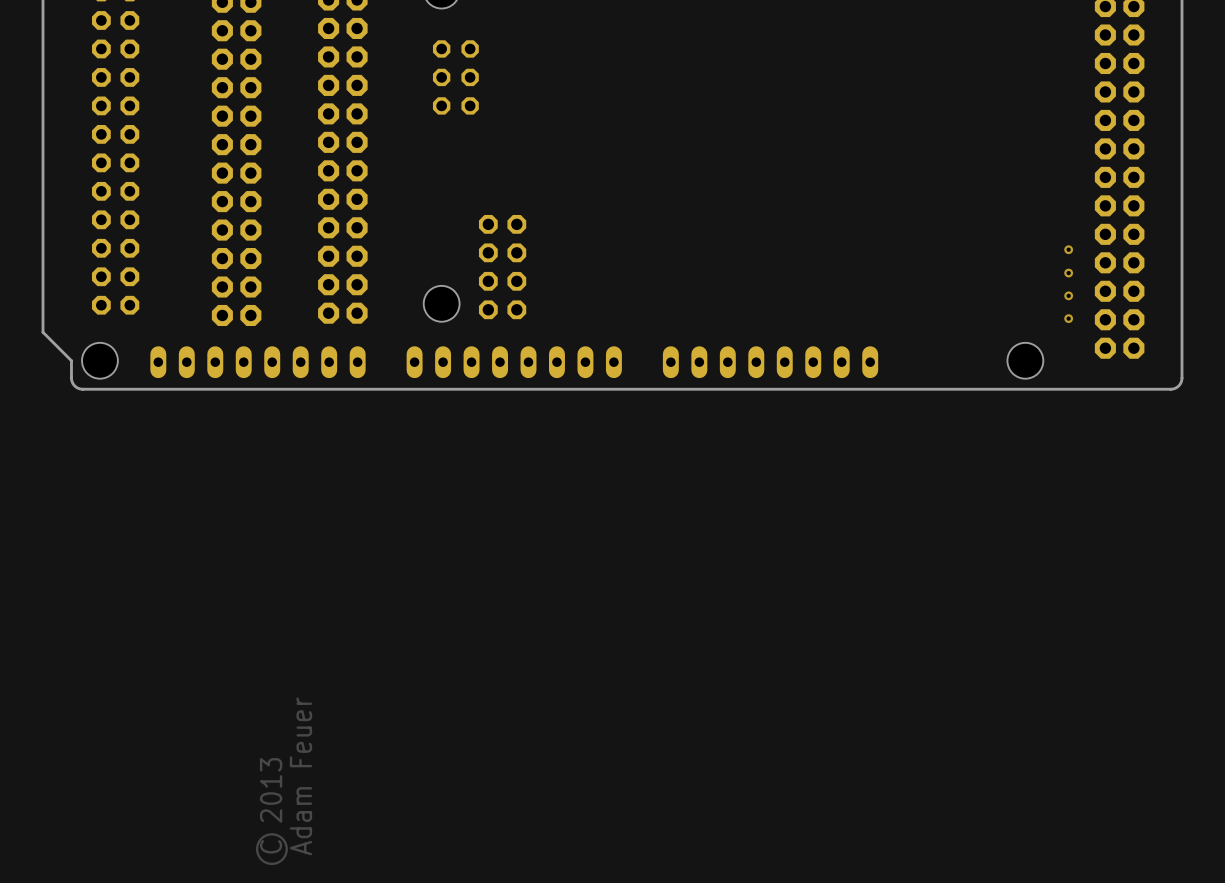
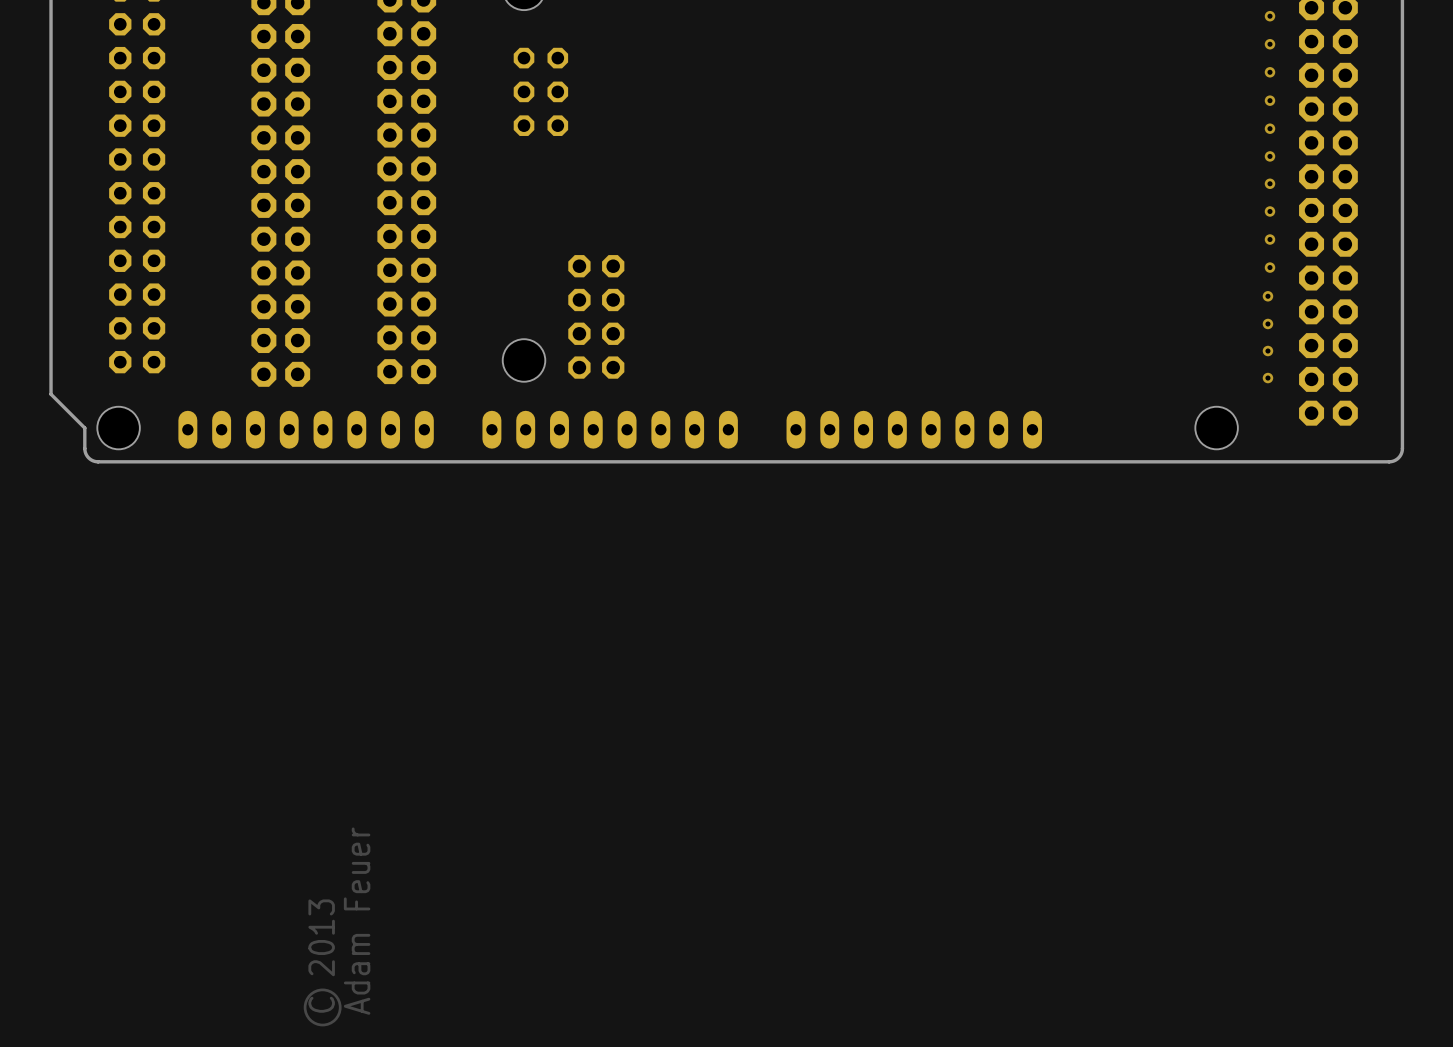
via: none -> (1269, 16)
via: none -> (1269, 44)
via: none -> (1269, 72)
via: none -> (1269, 100)
via: none -> (1269, 128)
via: none -> (1269, 156)
via: none -> (1269, 183)
via: none -> (1269, 211)
via: none -> (1269, 239)
via: none -> (1269, 267)

